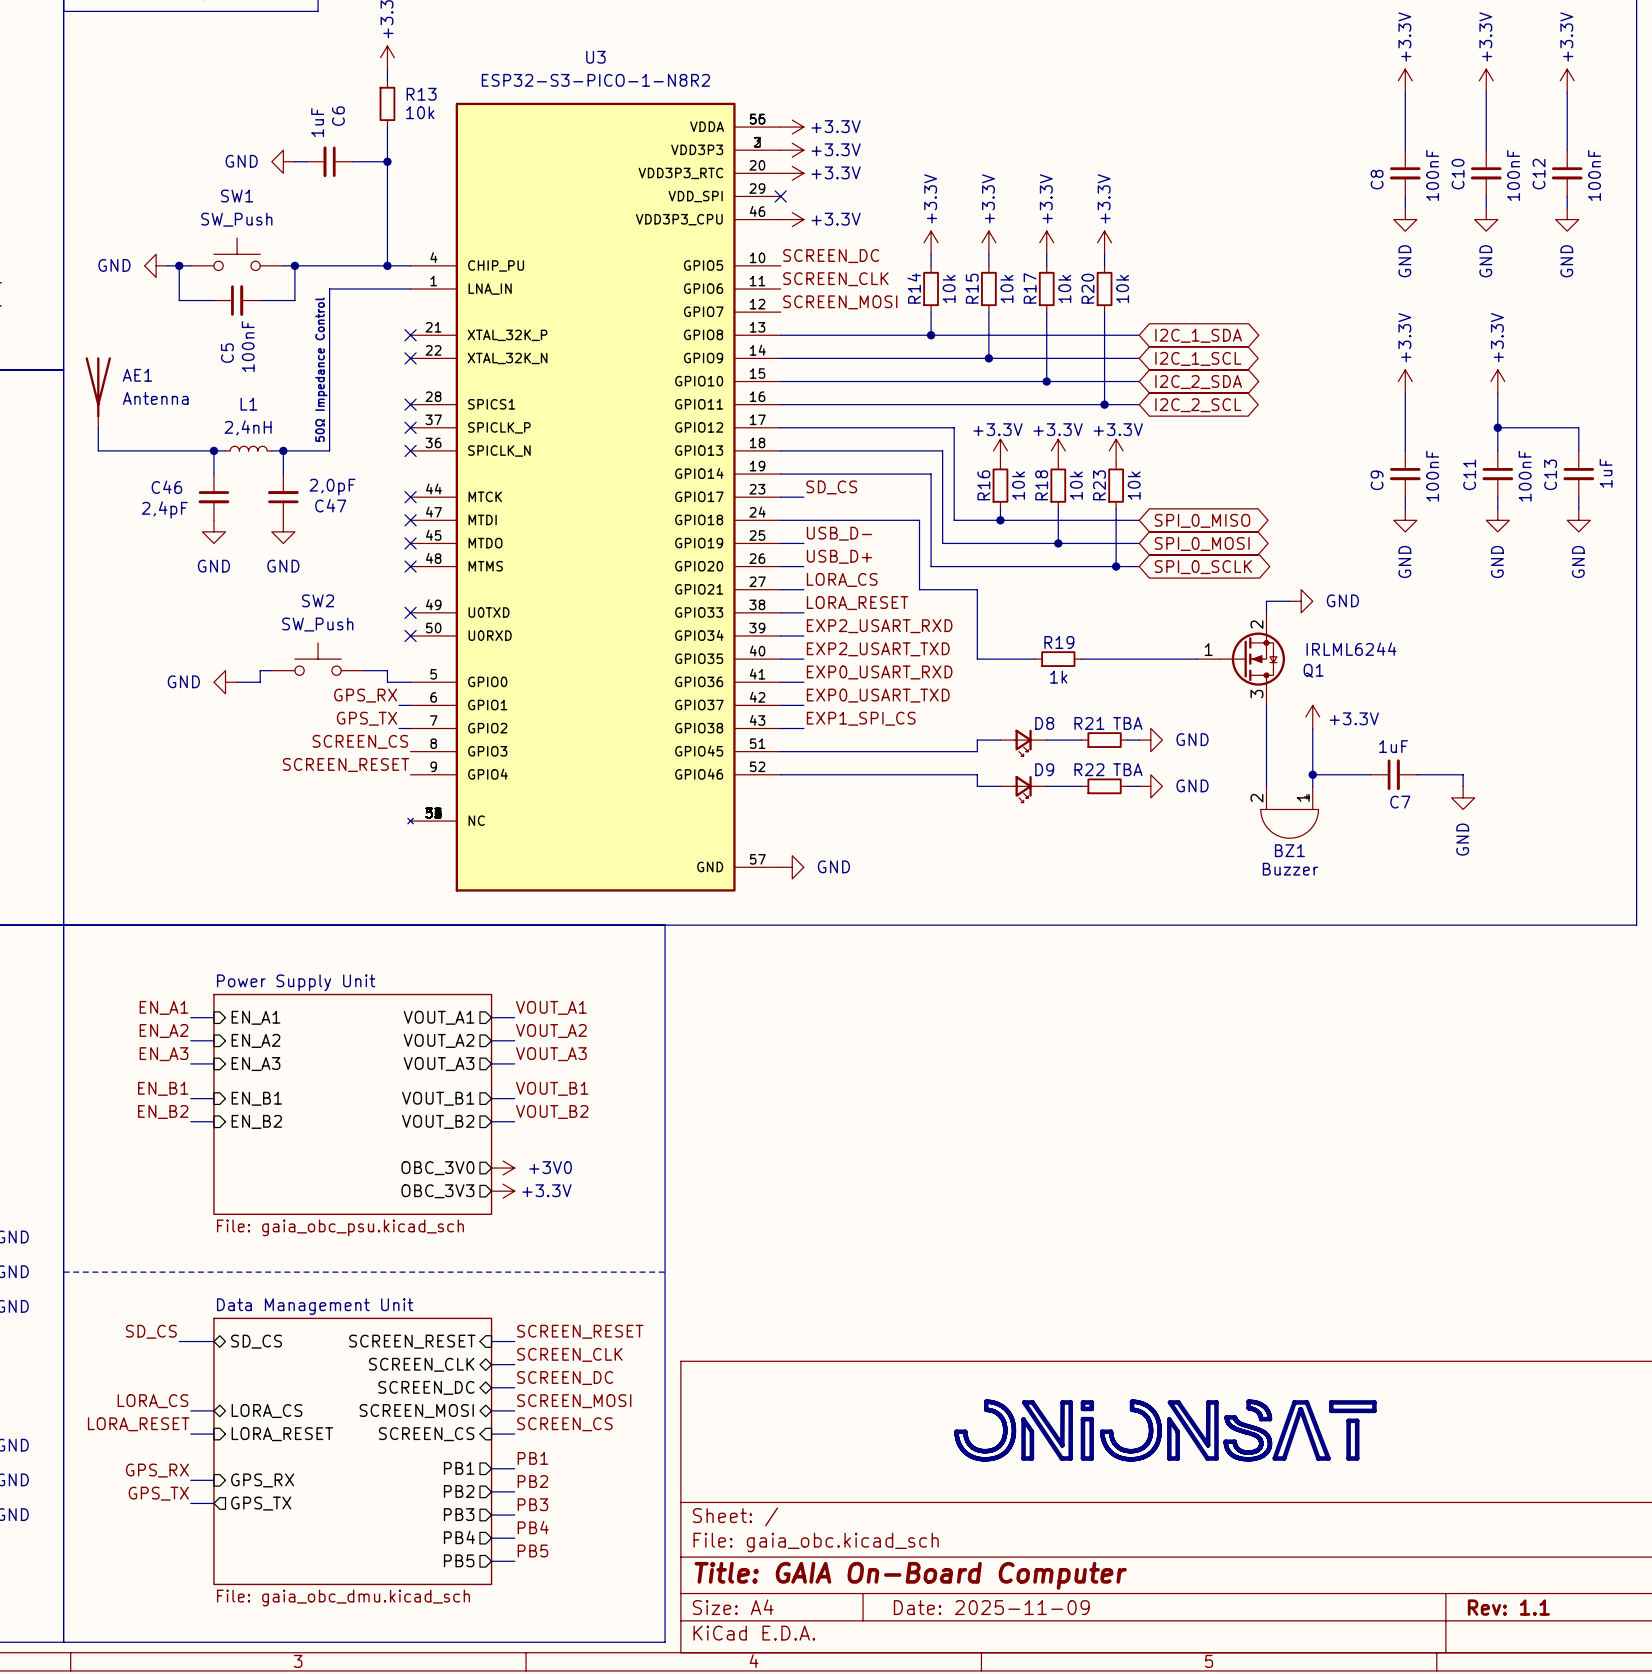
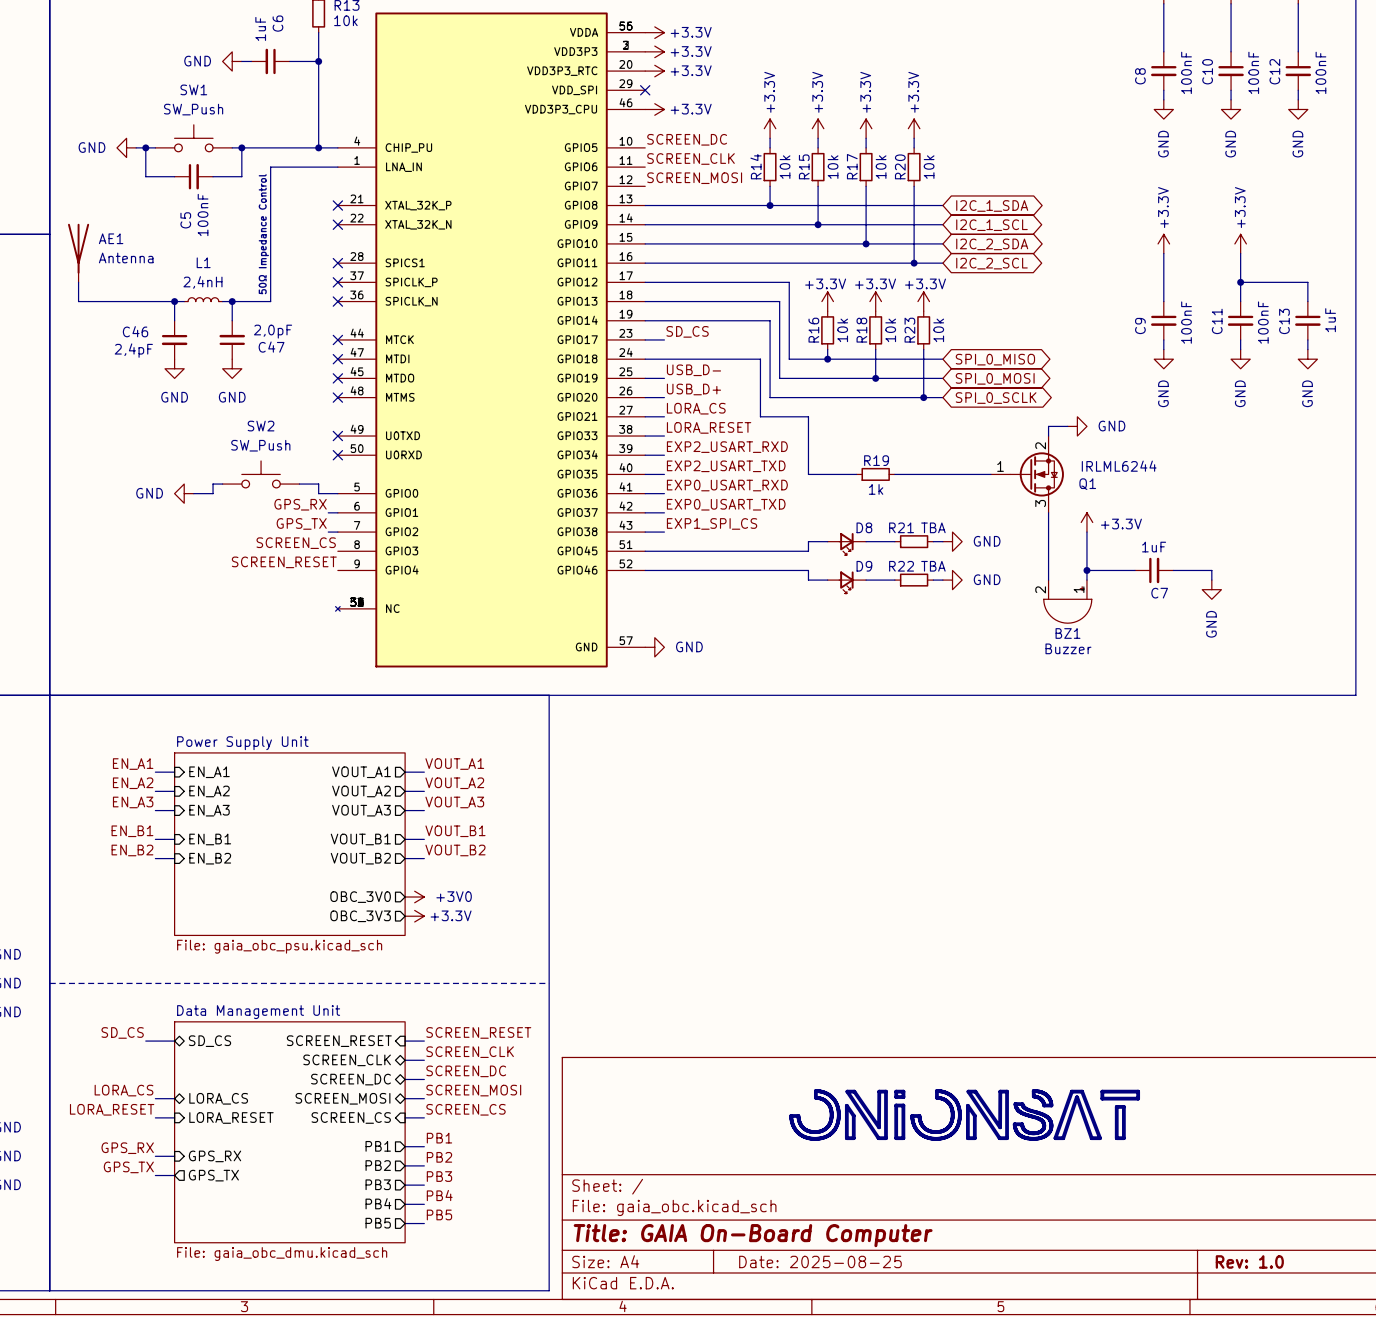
title block: Date: 2025-11-09 (991, 1607) -> Date: 2025-08-25 (820, 1261)
title block: Rev: 1.1 (1508, 1607) -> Rev: 1.0 (1249, 1261)

